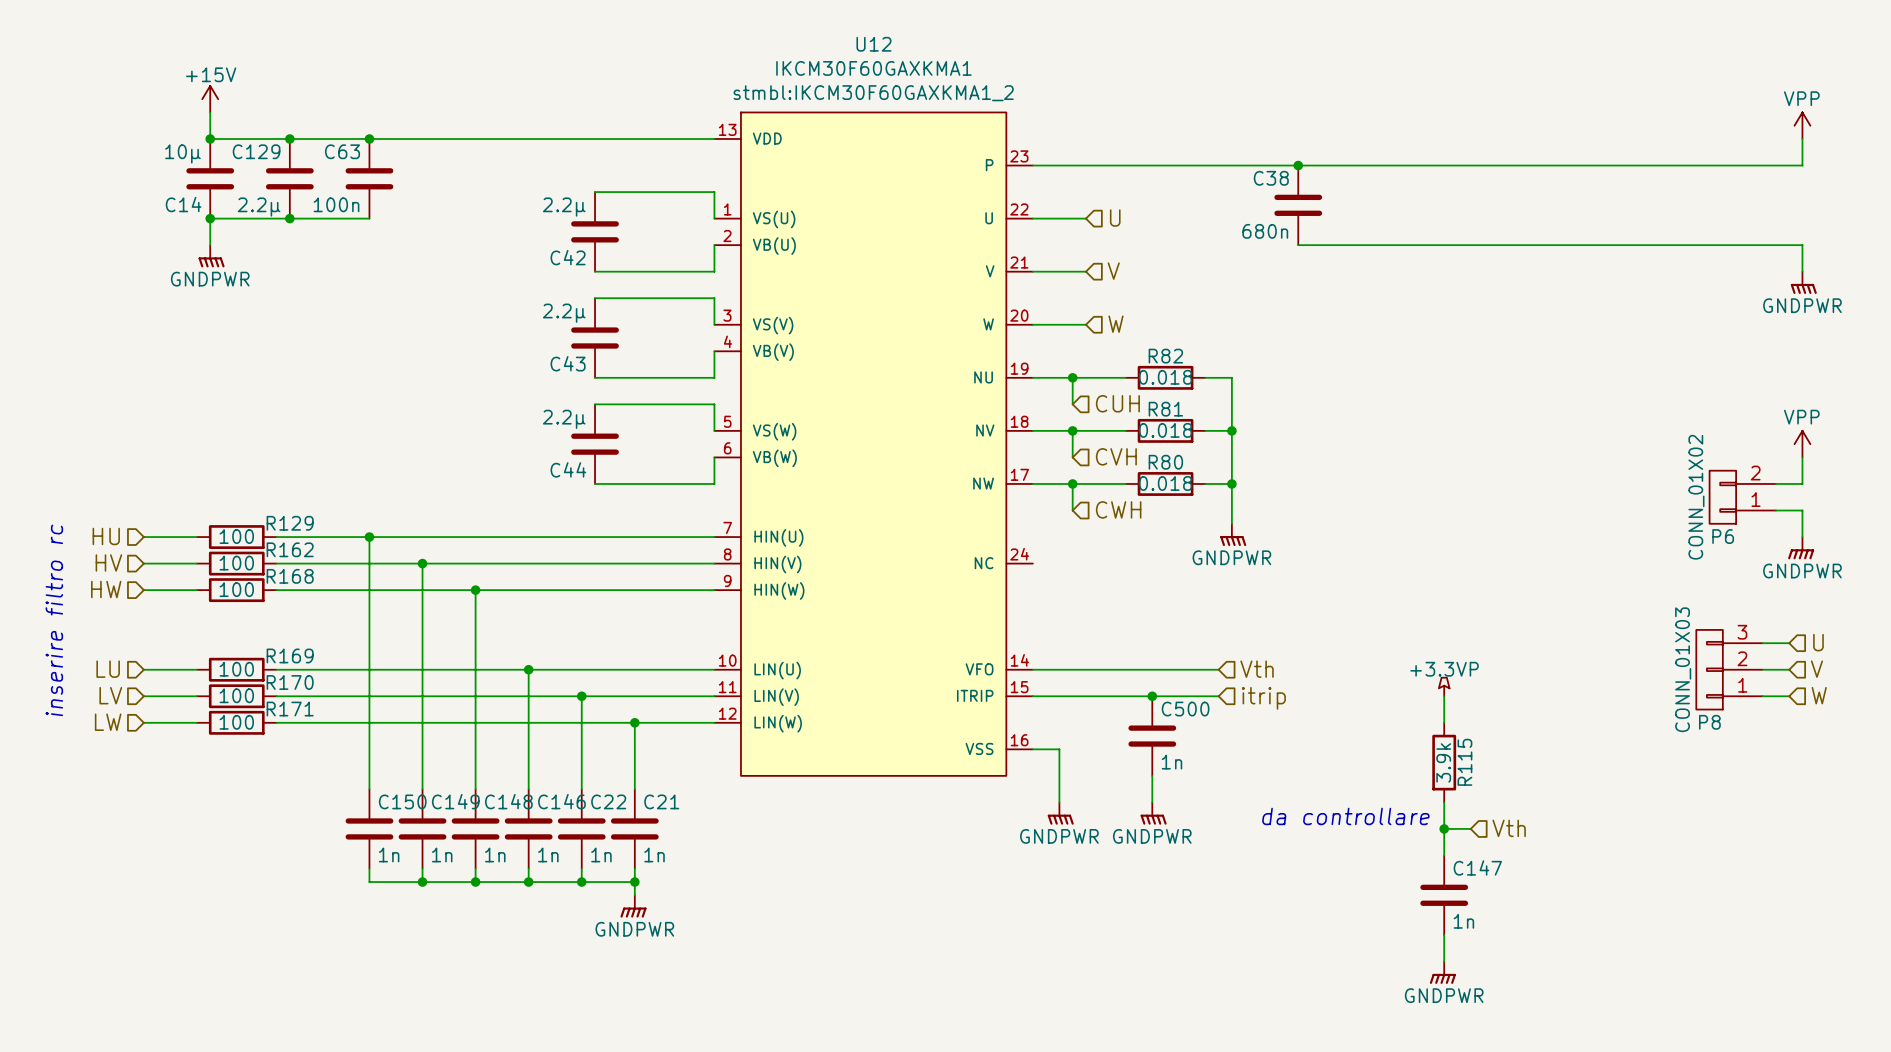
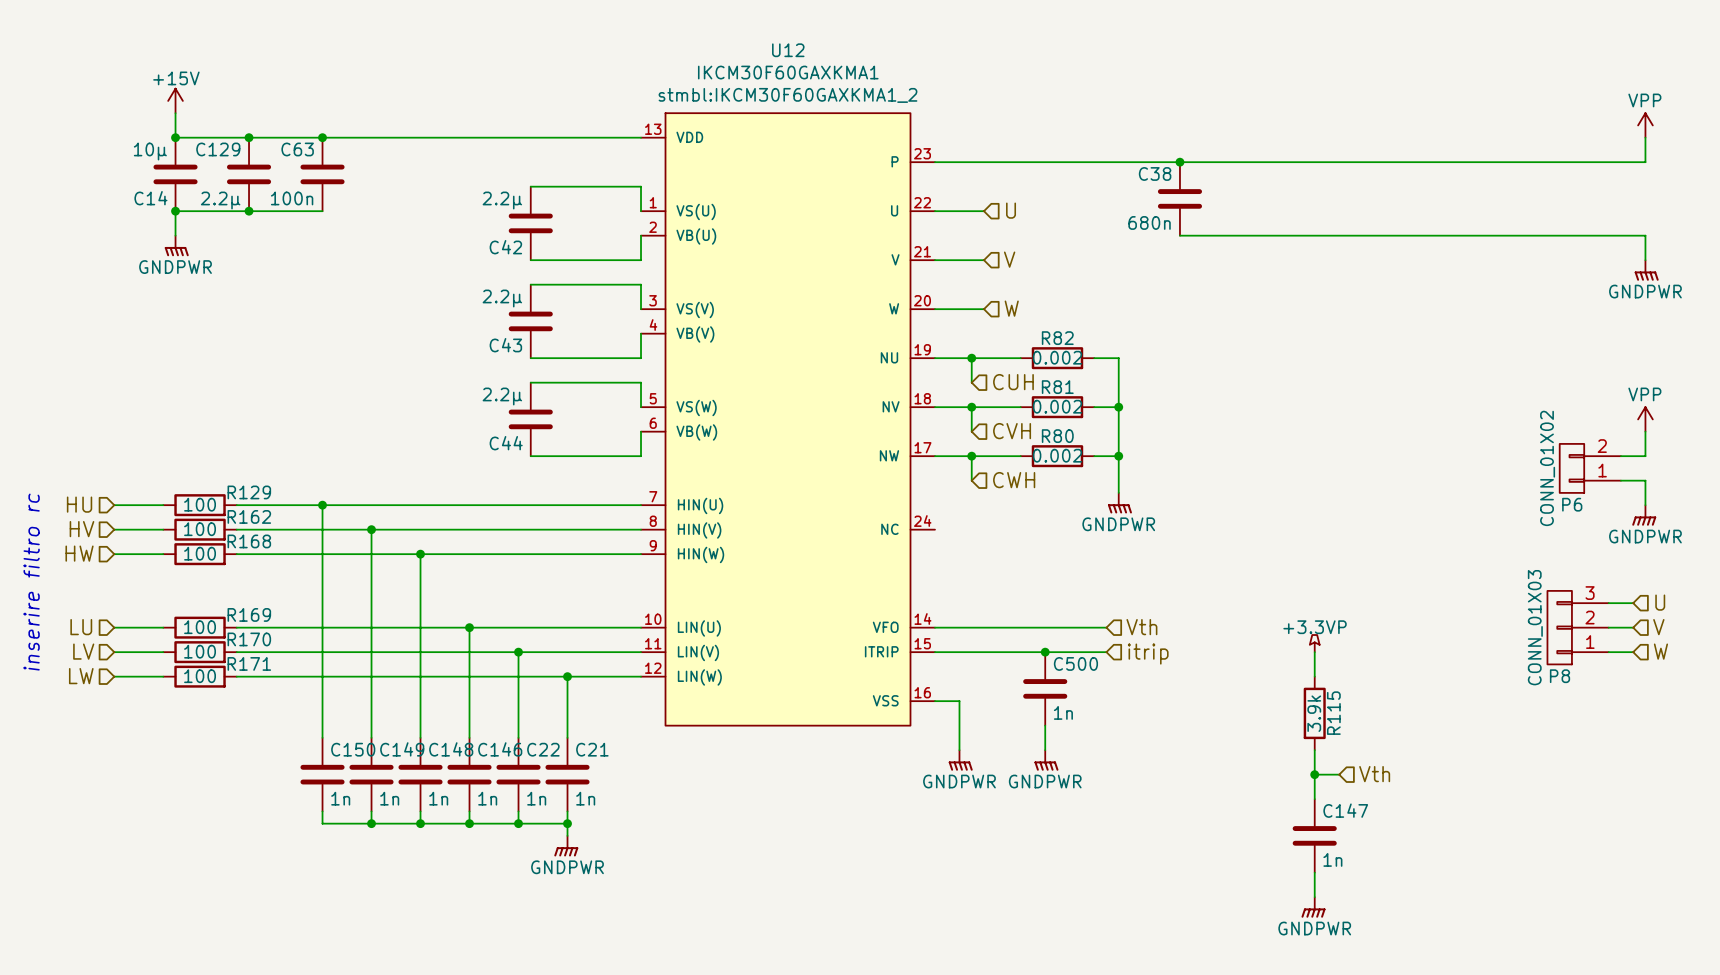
R82 value: 0.018 (1165, 377) -> 0.002 (1057, 357)
R81 value: 0.018 (1165, 430) -> 0.002 (1057, 406)
R80 value: 0.018 (1165, 483) -> 0.002 (1057, 455)
text: da controllare (1345, 816) -> none

